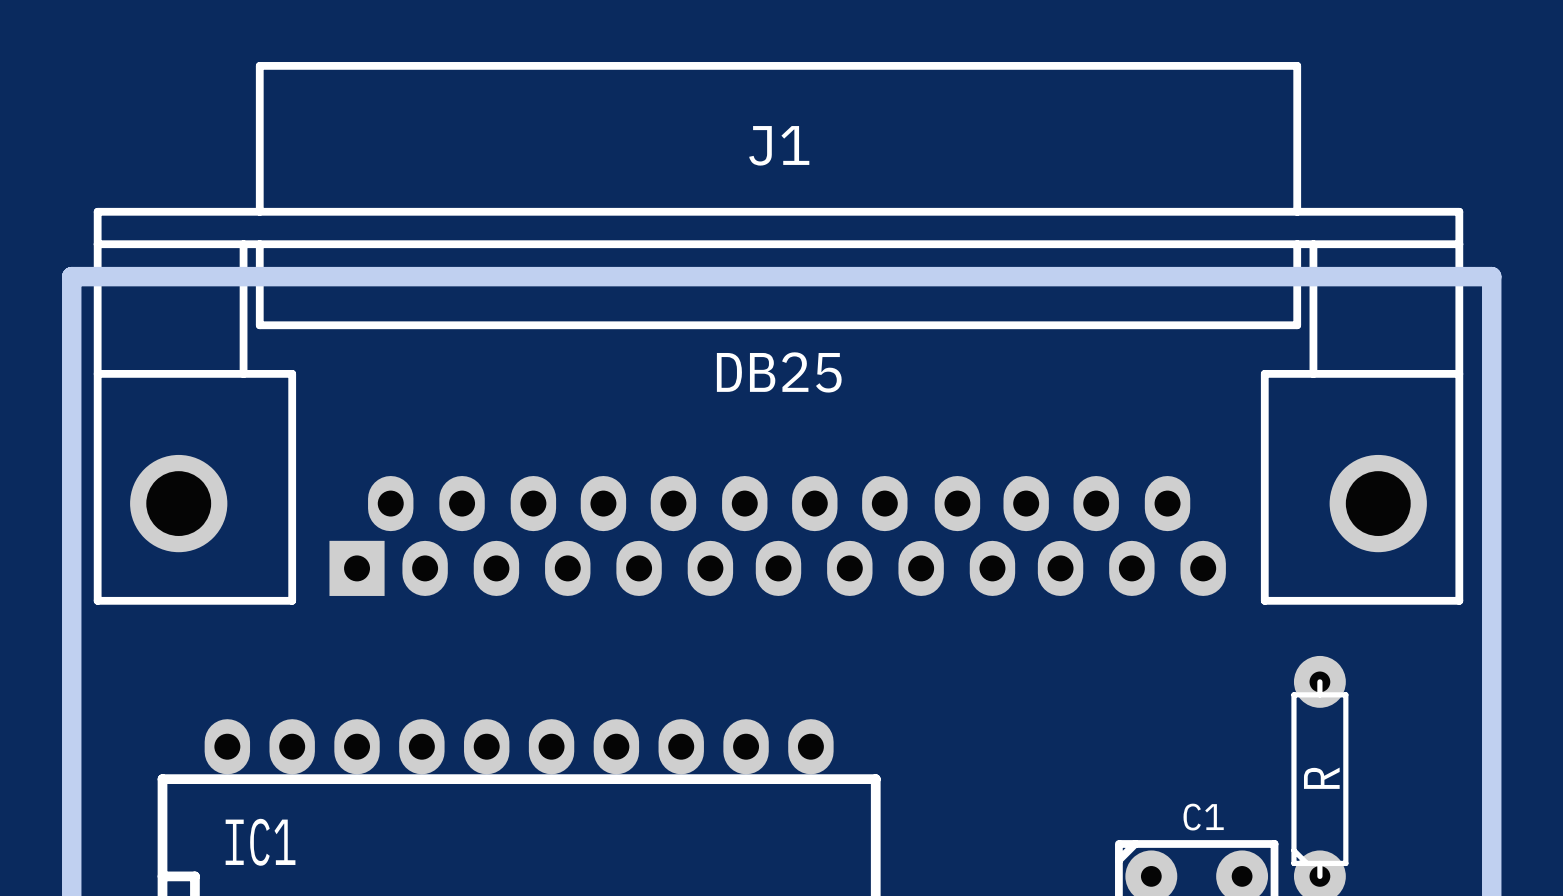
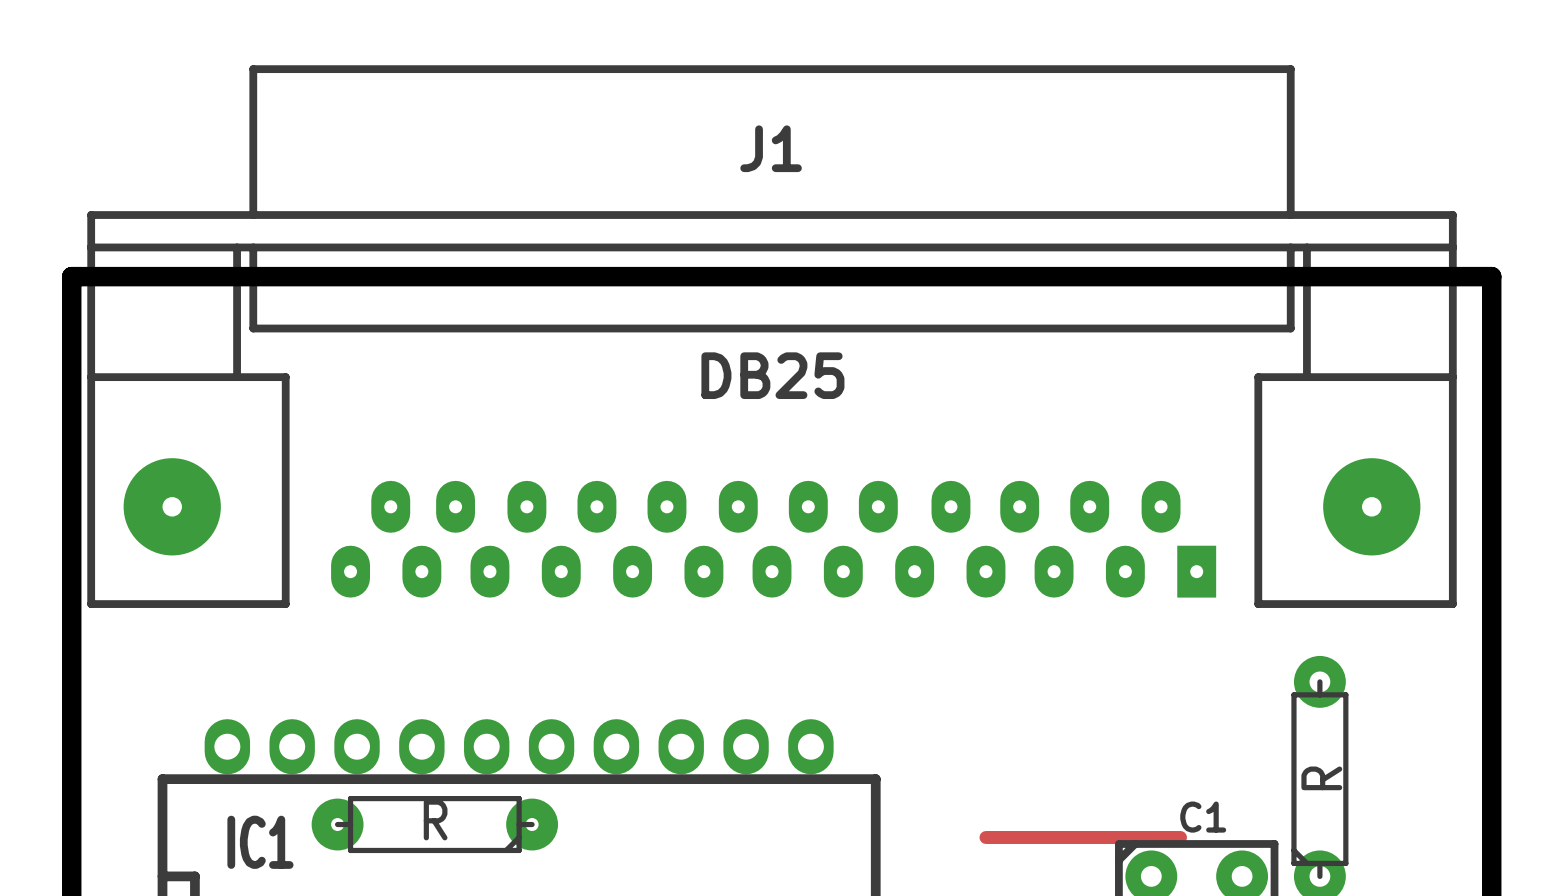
J1 footprint: [93, 62, 1464, 605] -> [87, 65, 1457, 608]
part: none -> R (434, 824)
track: none -> (985, 837) (1180, 837)

